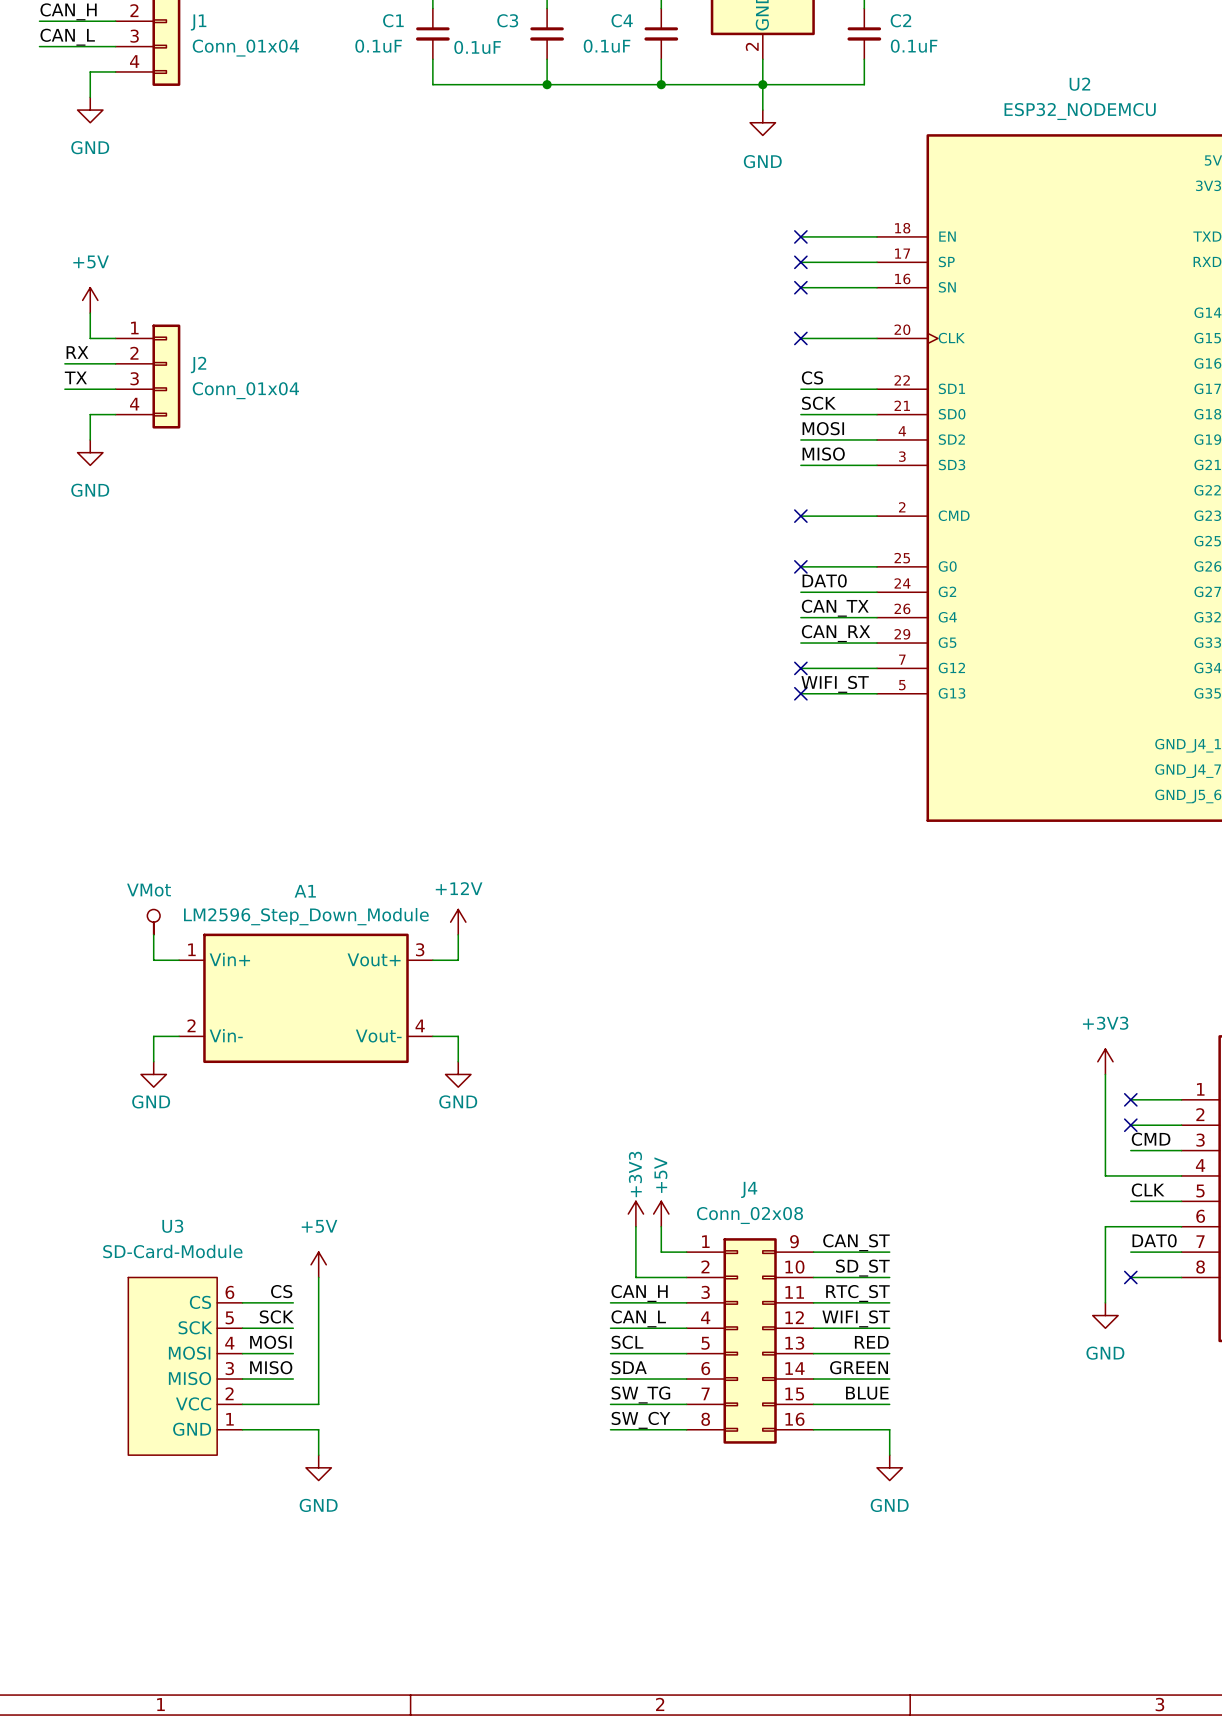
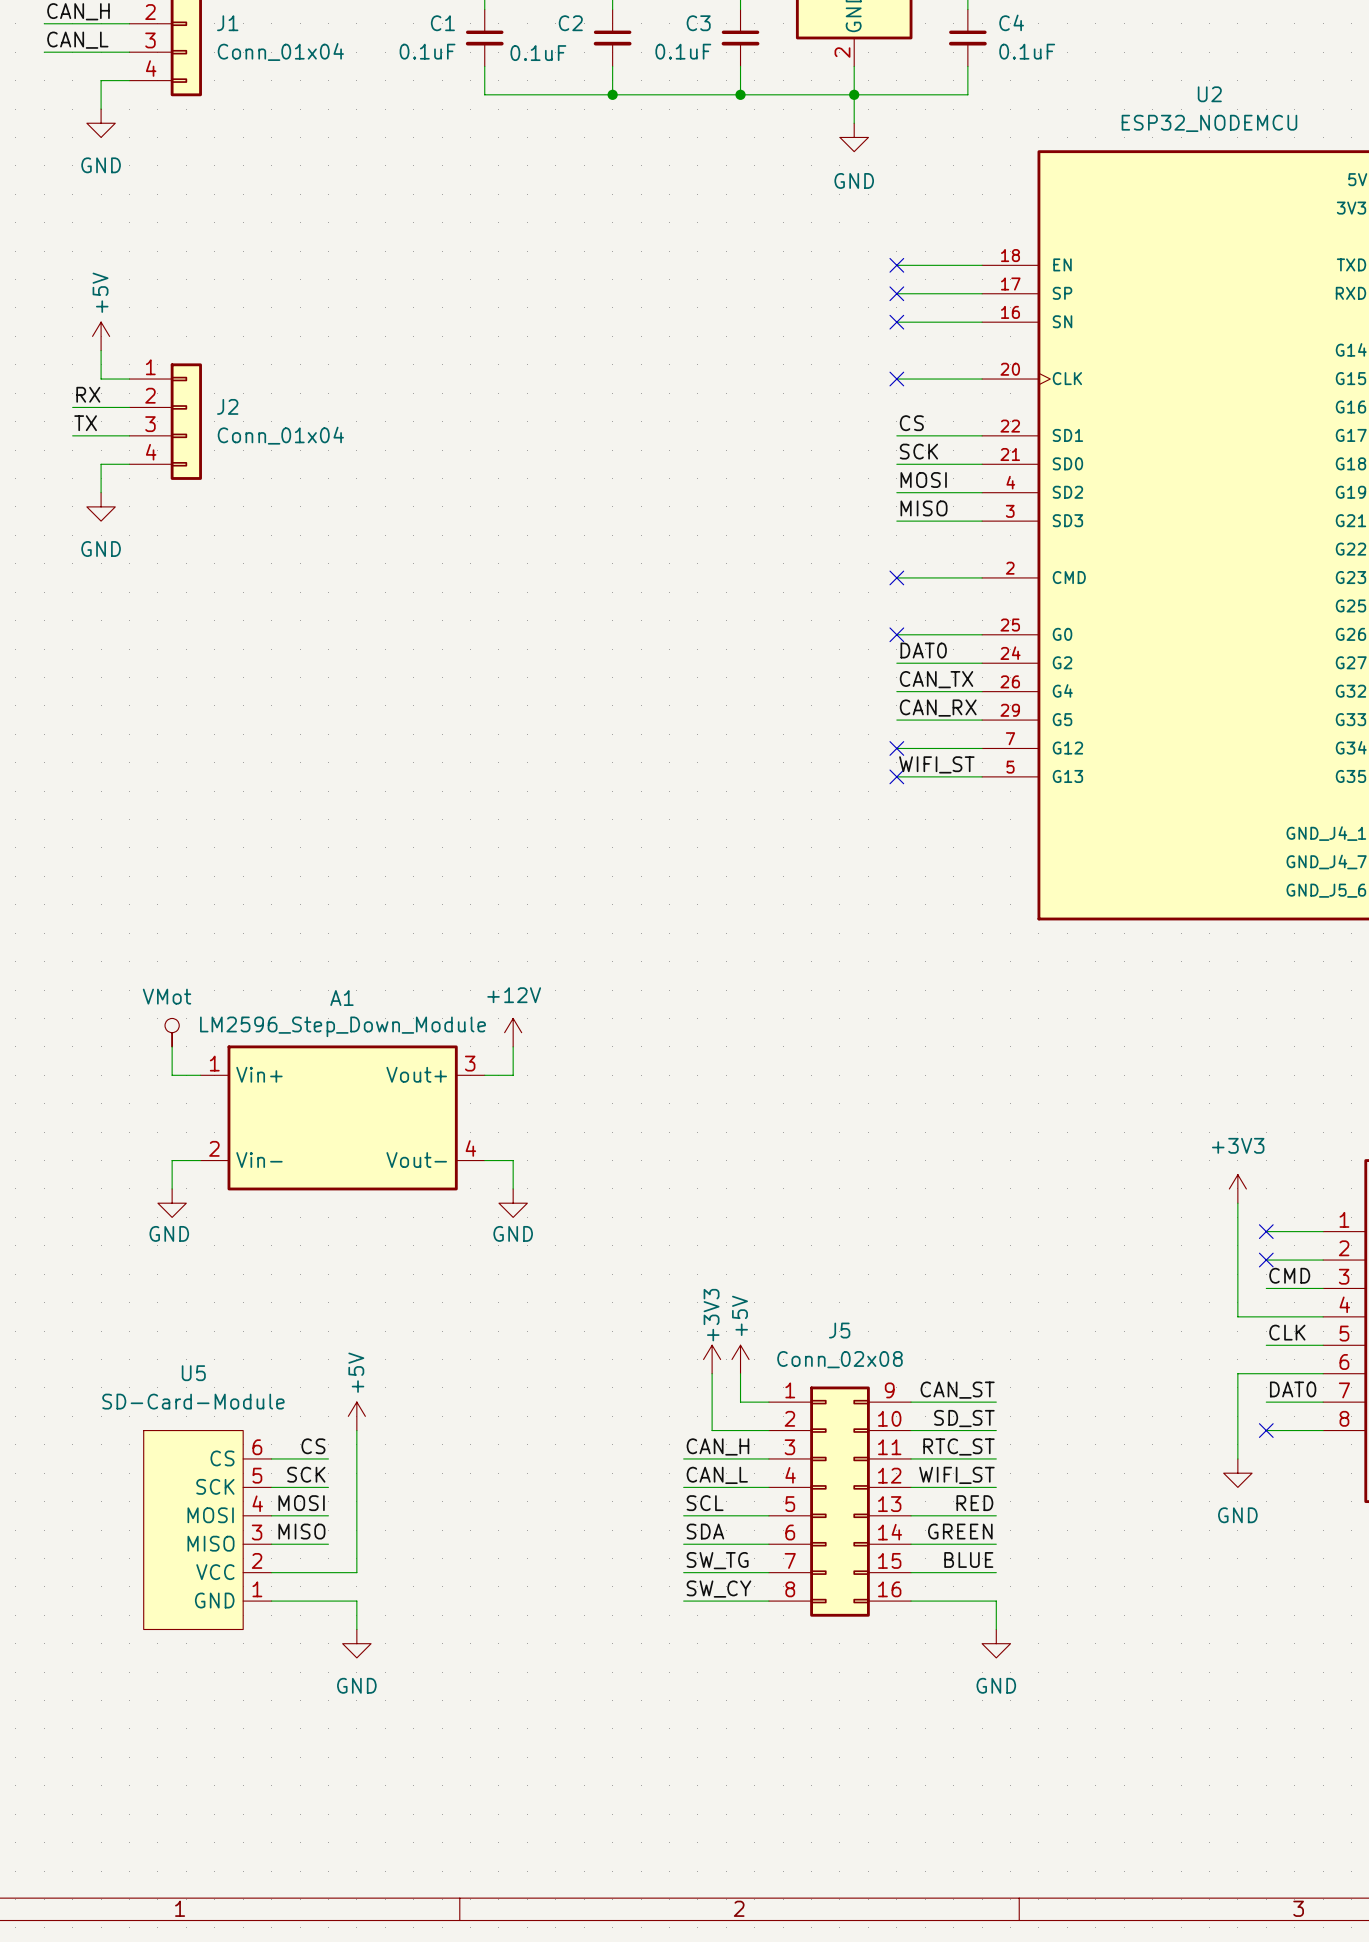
C3 name: C3 (507, 20) -> C2 (570, 23)
C4 name: C4 (622, 20) -> C3 (698, 23)
C2 name: C2 (900, 20) -> C4 (1011, 22)
power symbol text rotation: 0° (91, 261) -> 90° counterclockwise (100, 292)
J4 name: J4 (749, 1189) -> J5 (839, 1330)
U3 name: U3 (172, 1226) -> U5 (193, 1373)
power symbol text rotation: 0° (319, 1226) -> 90° counterclockwise (356, 1372)

